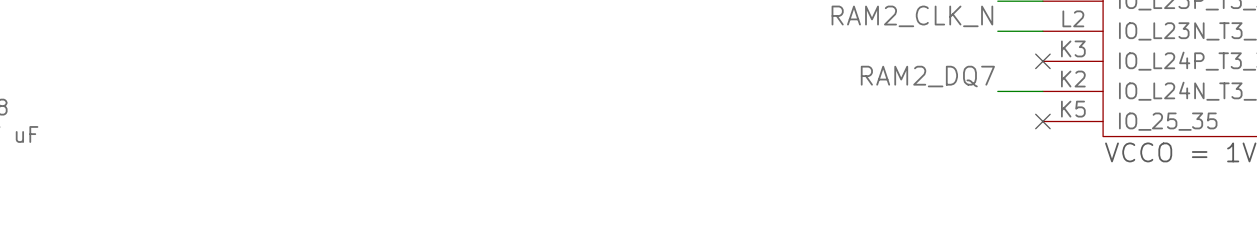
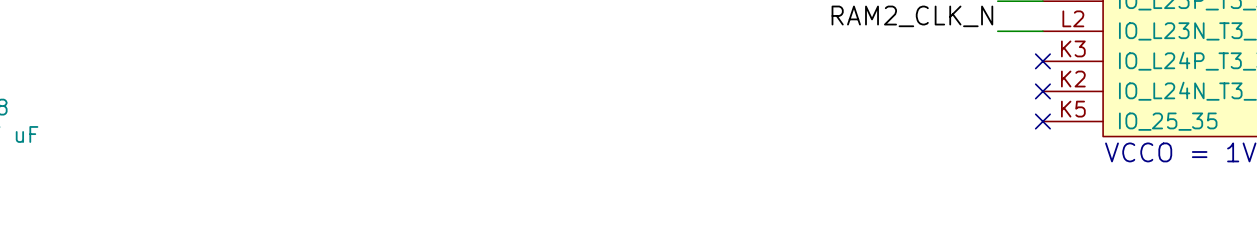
label: RAM2_DQ7 (927, 76) -> none
wire: (997, 91) (1042, 91) -> none
no-connect mark: none -> (1042, 91)

